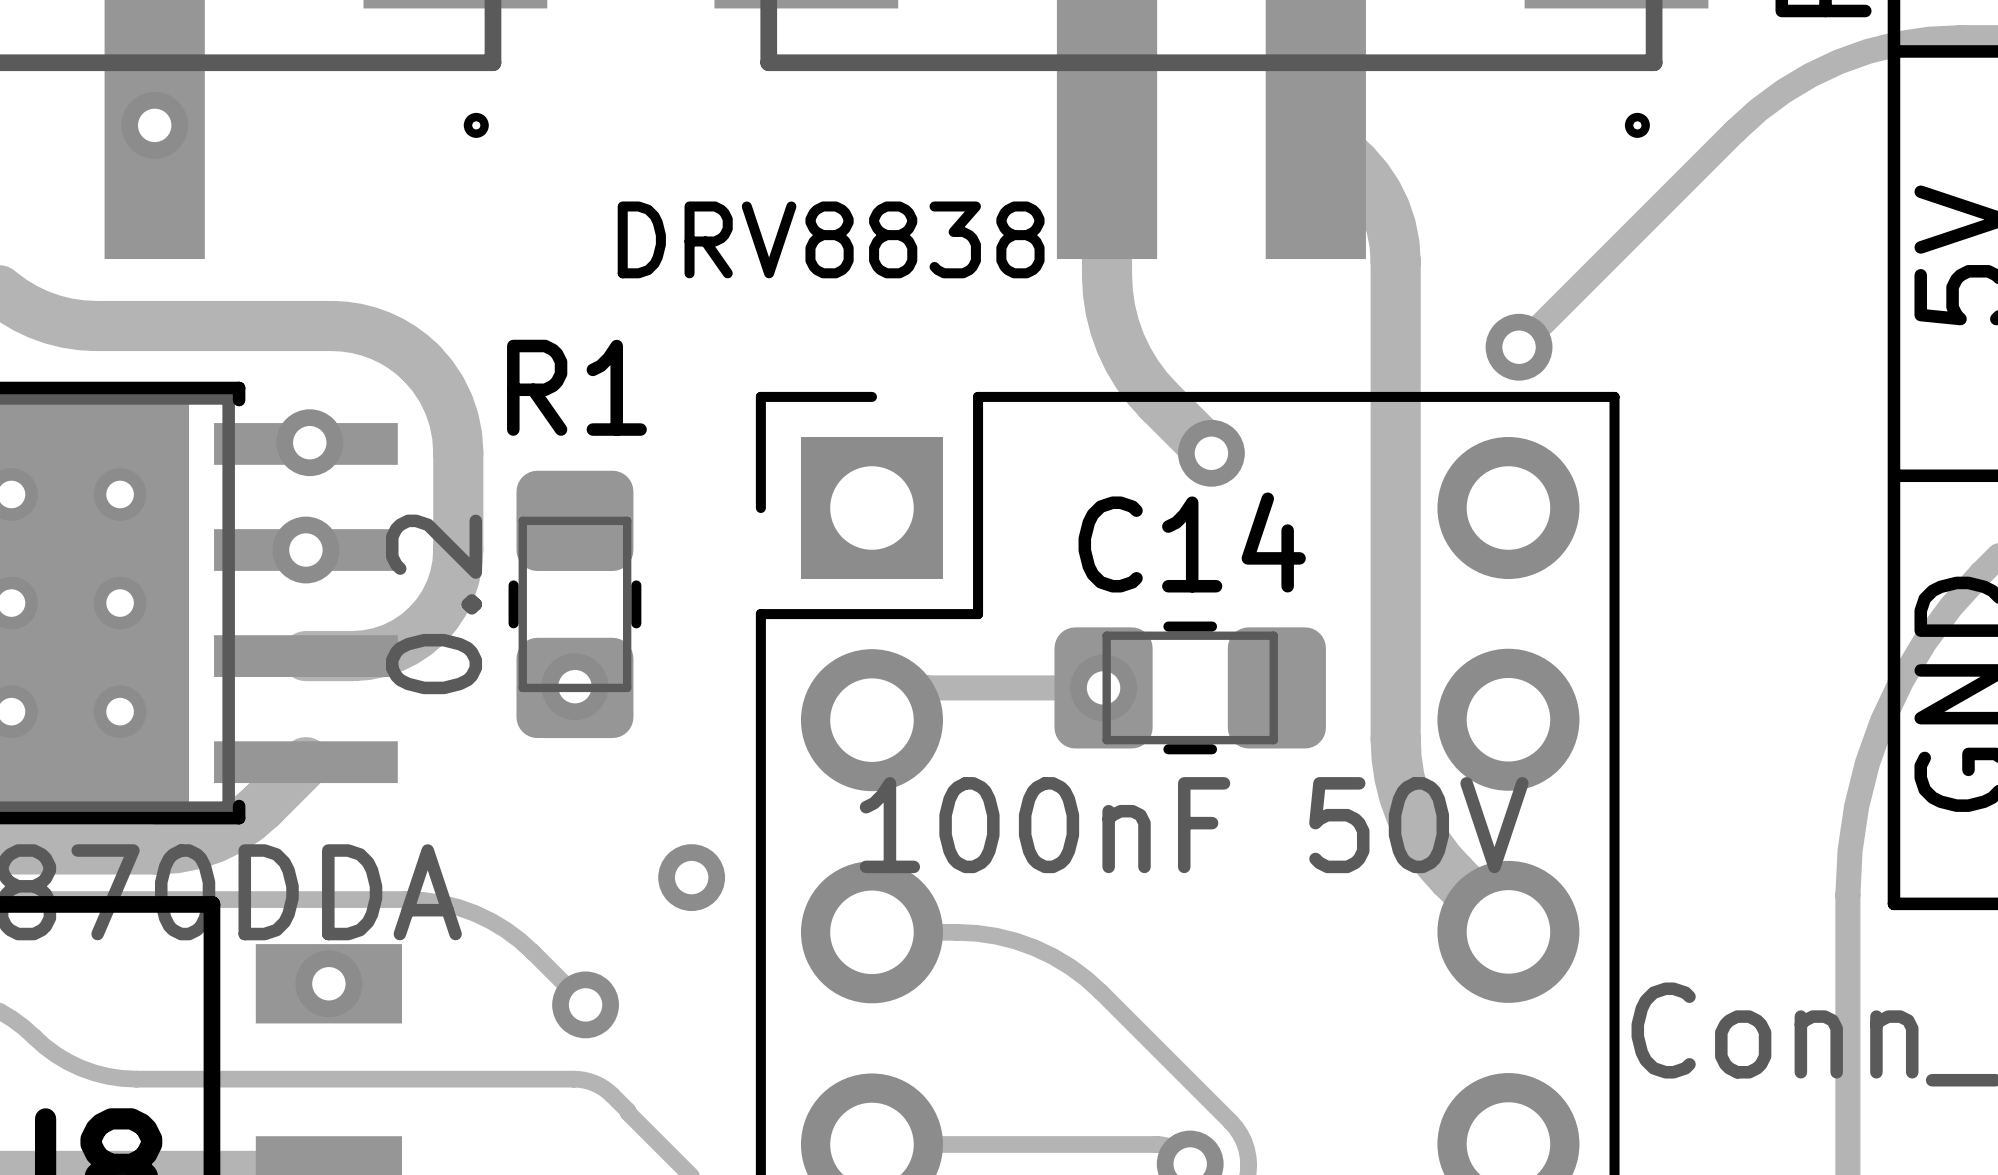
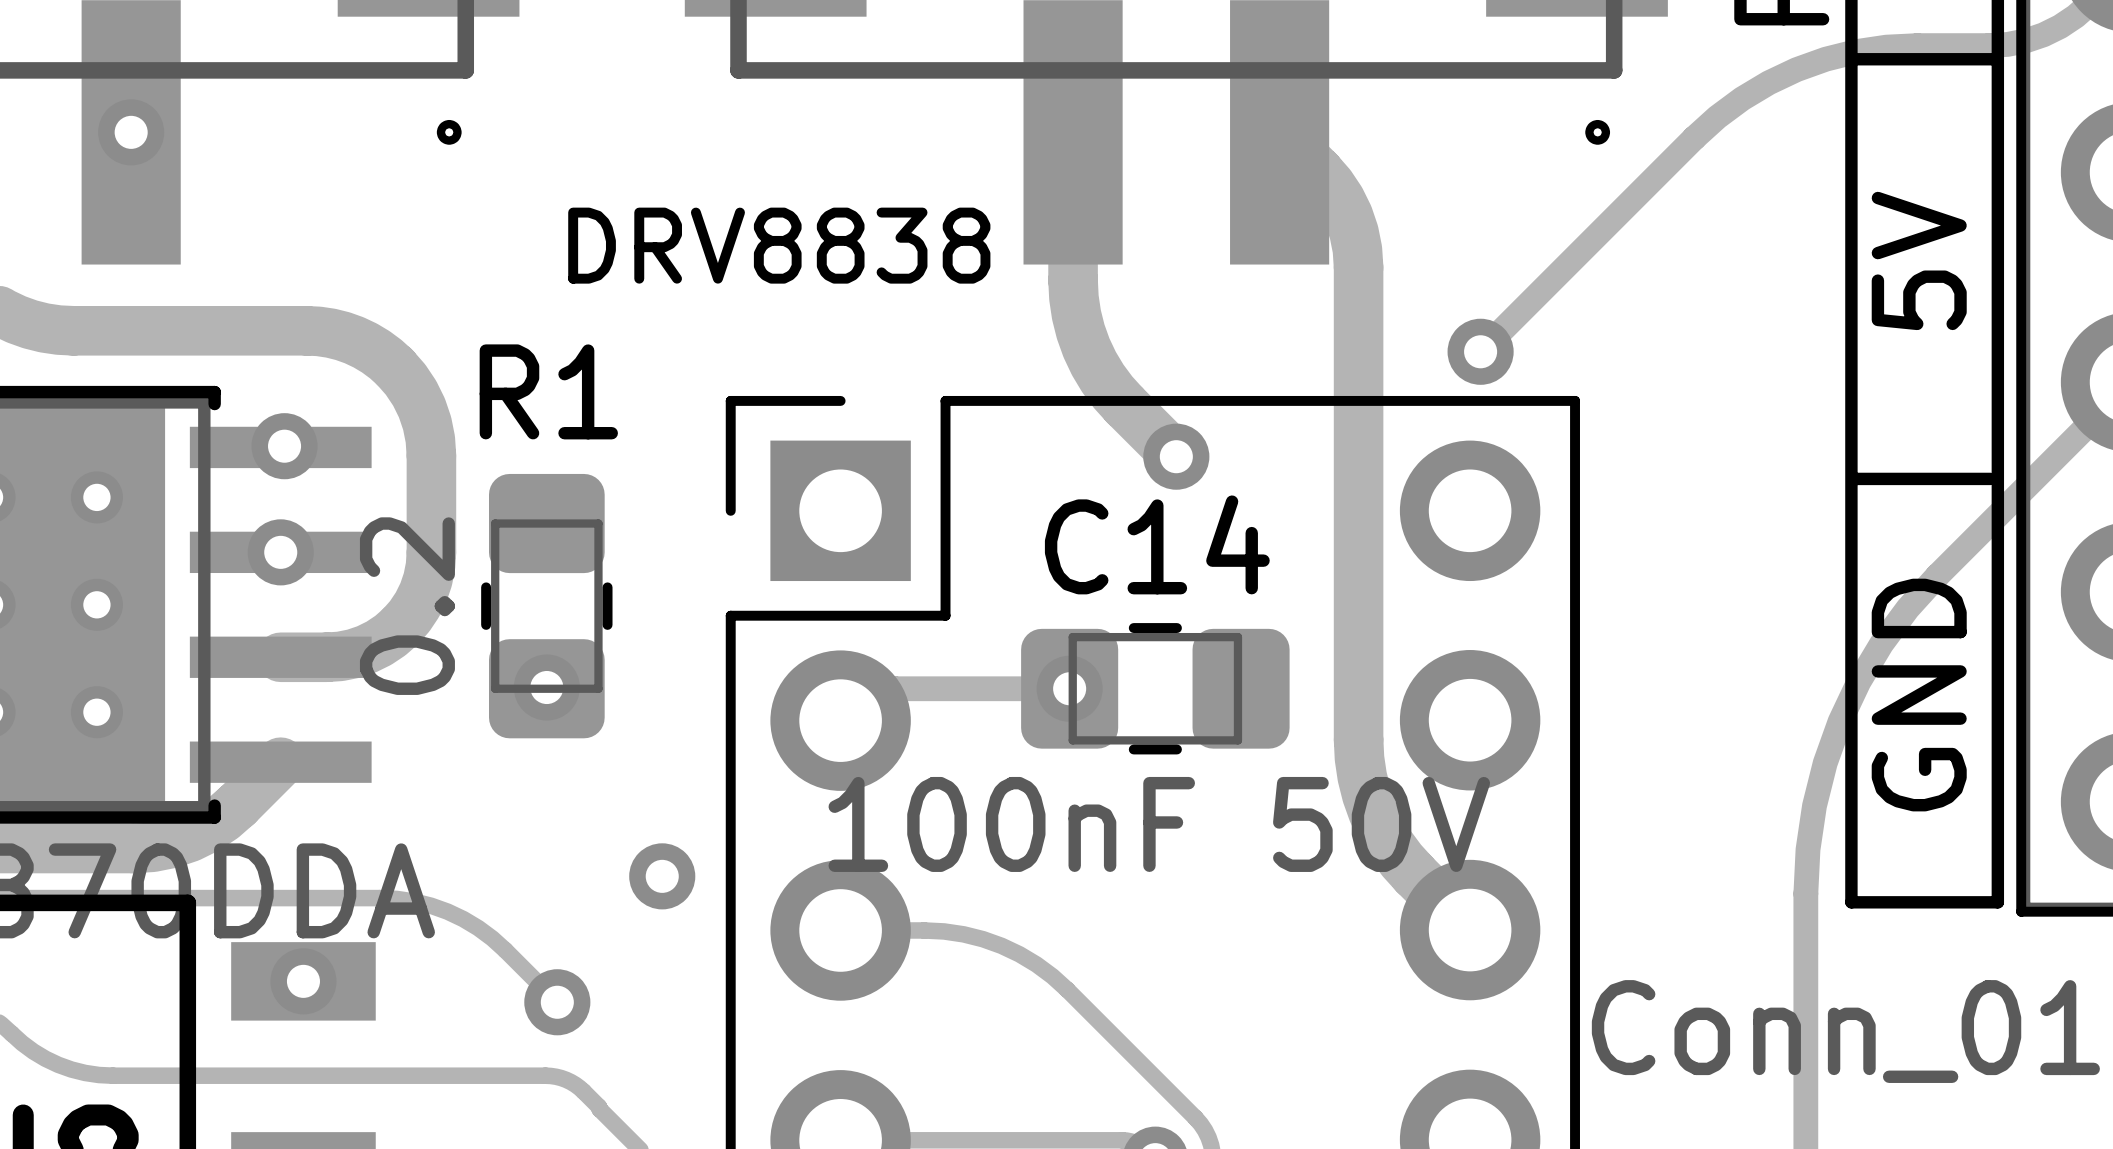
text position: DRV8838 (831, 239) -> DRV8838 (779, 245)

